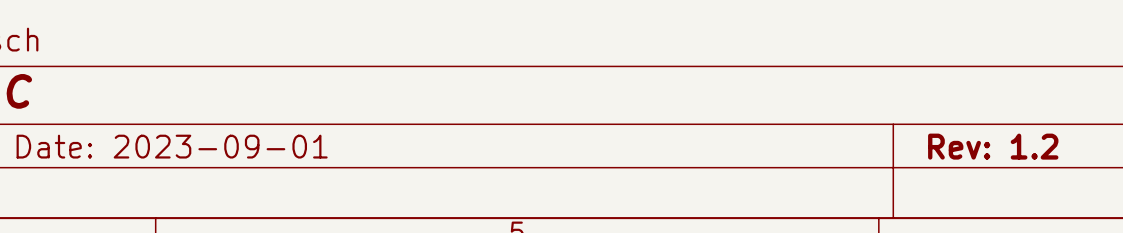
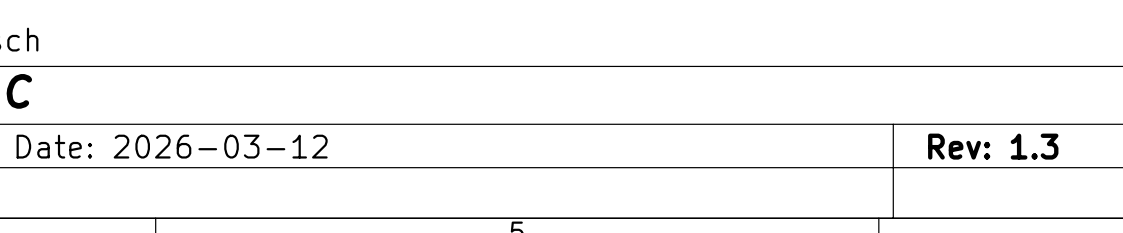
title block: Date: 2023-09-01 (172, 146) -> Date: 2026-03-12 (172, 146)
title block: Rev: 1.2 (993, 146) -> Rev: 1.3 (993, 146)

